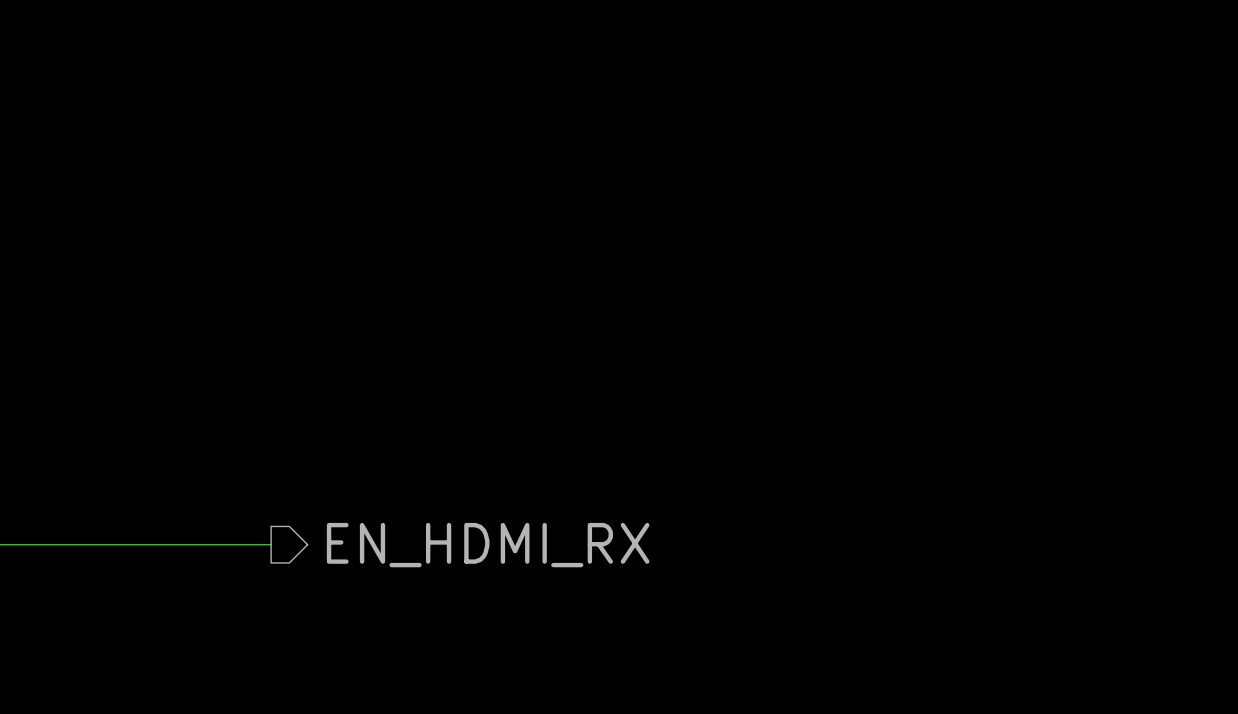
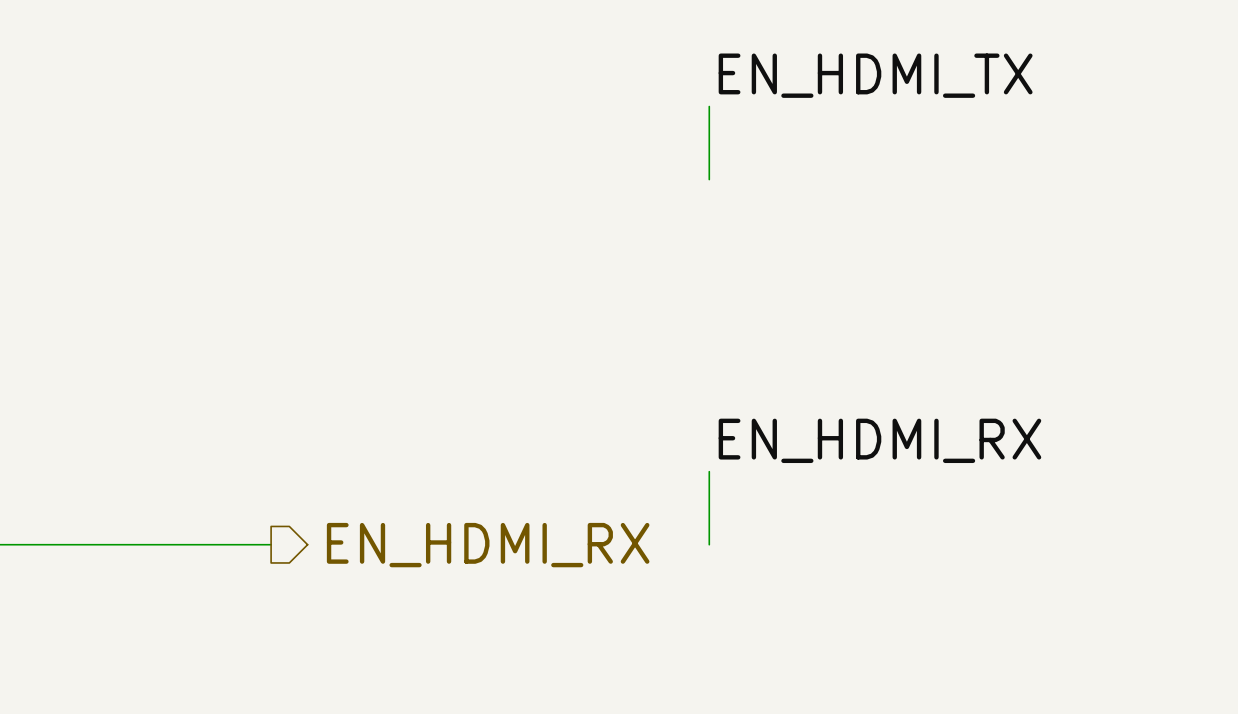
label: none -> EN_HDMI_TX (875, 75)
wire: none -> (709, 106) (709, 179)
label: none -> EN_HDMI_RX (879, 440)
wire: none -> (709, 471) (709, 544)

